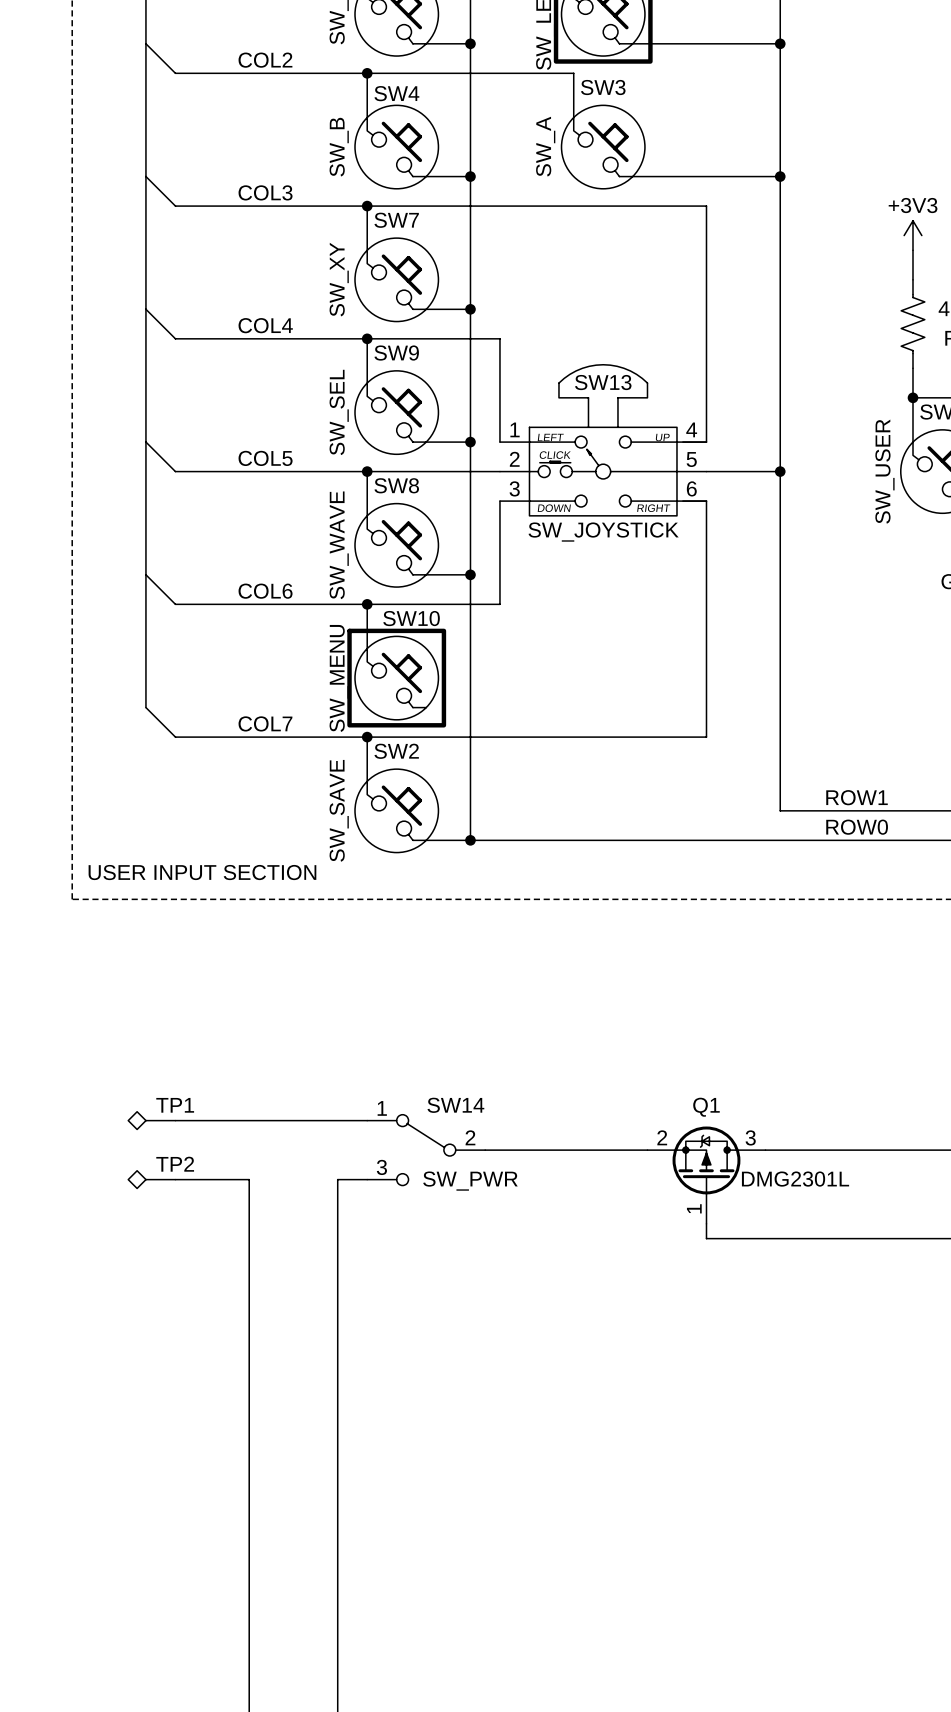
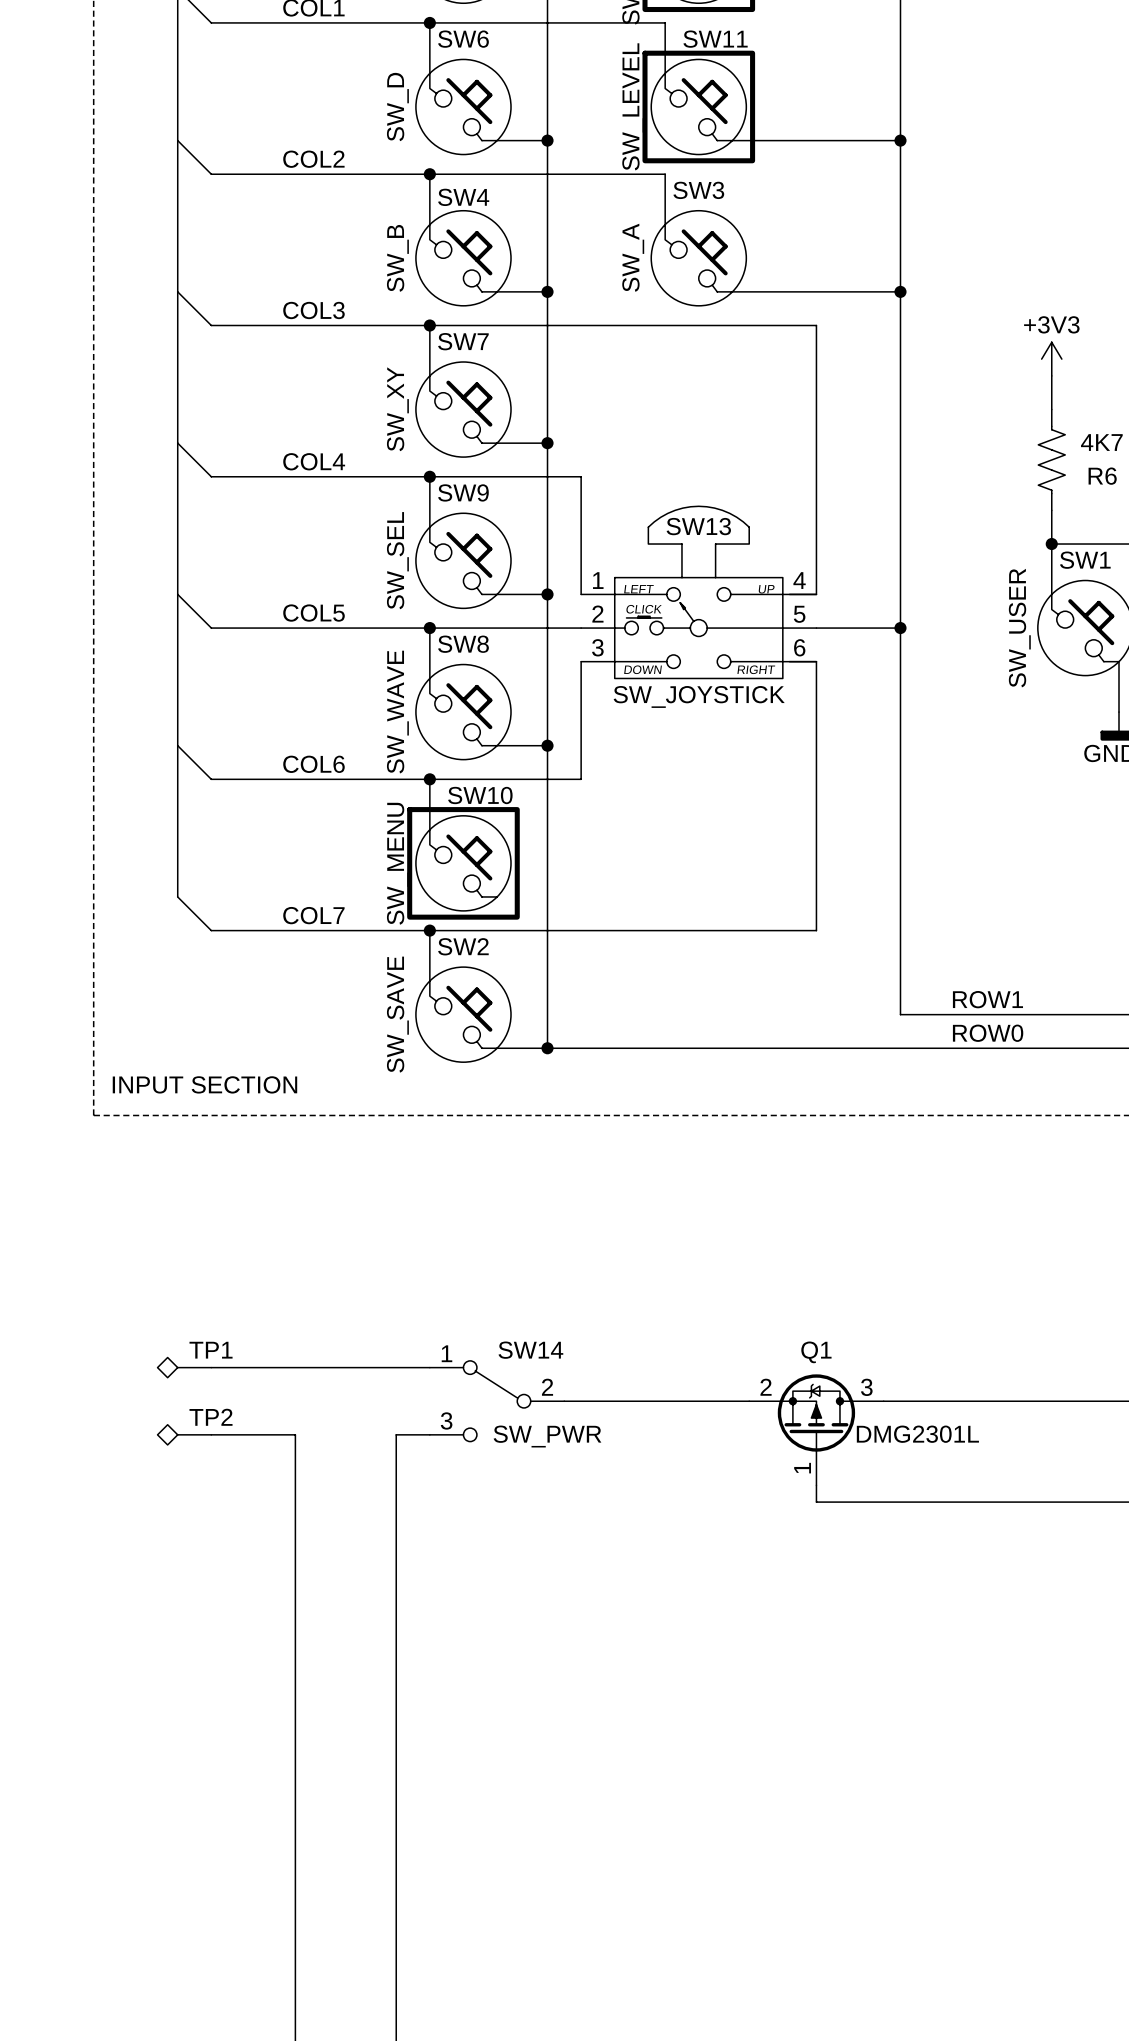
text: USER INPUT SECTION (202, 872) -> INPUT SECTION (204, 1084)

